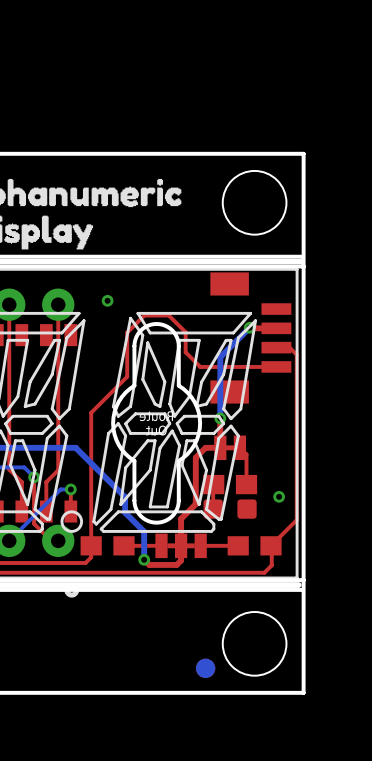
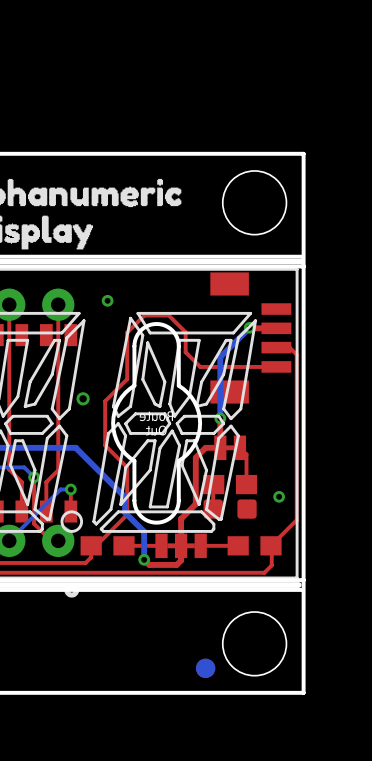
top track: (127, 376) (91, 412) (91, 545) -> (127, 376) (127, 379) (105, 401) (105, 445) (127, 467) (127, 514) (96, 545) (91, 545)
via: none -> (83, 398)

